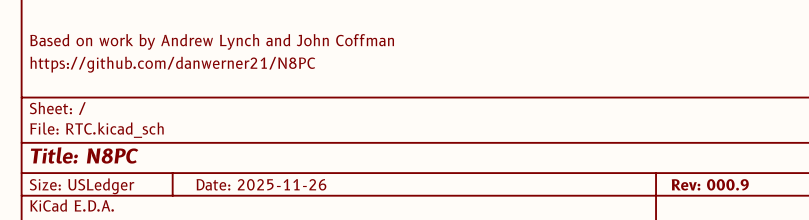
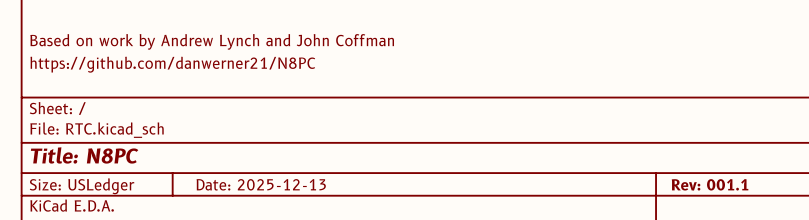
title block: Date: 2025-11-26 (261, 184) -> Date: 2025-12-13 (261, 184)
title block: Rev: 000.9 (710, 184) -> Rev: 001.1 (710, 184)

